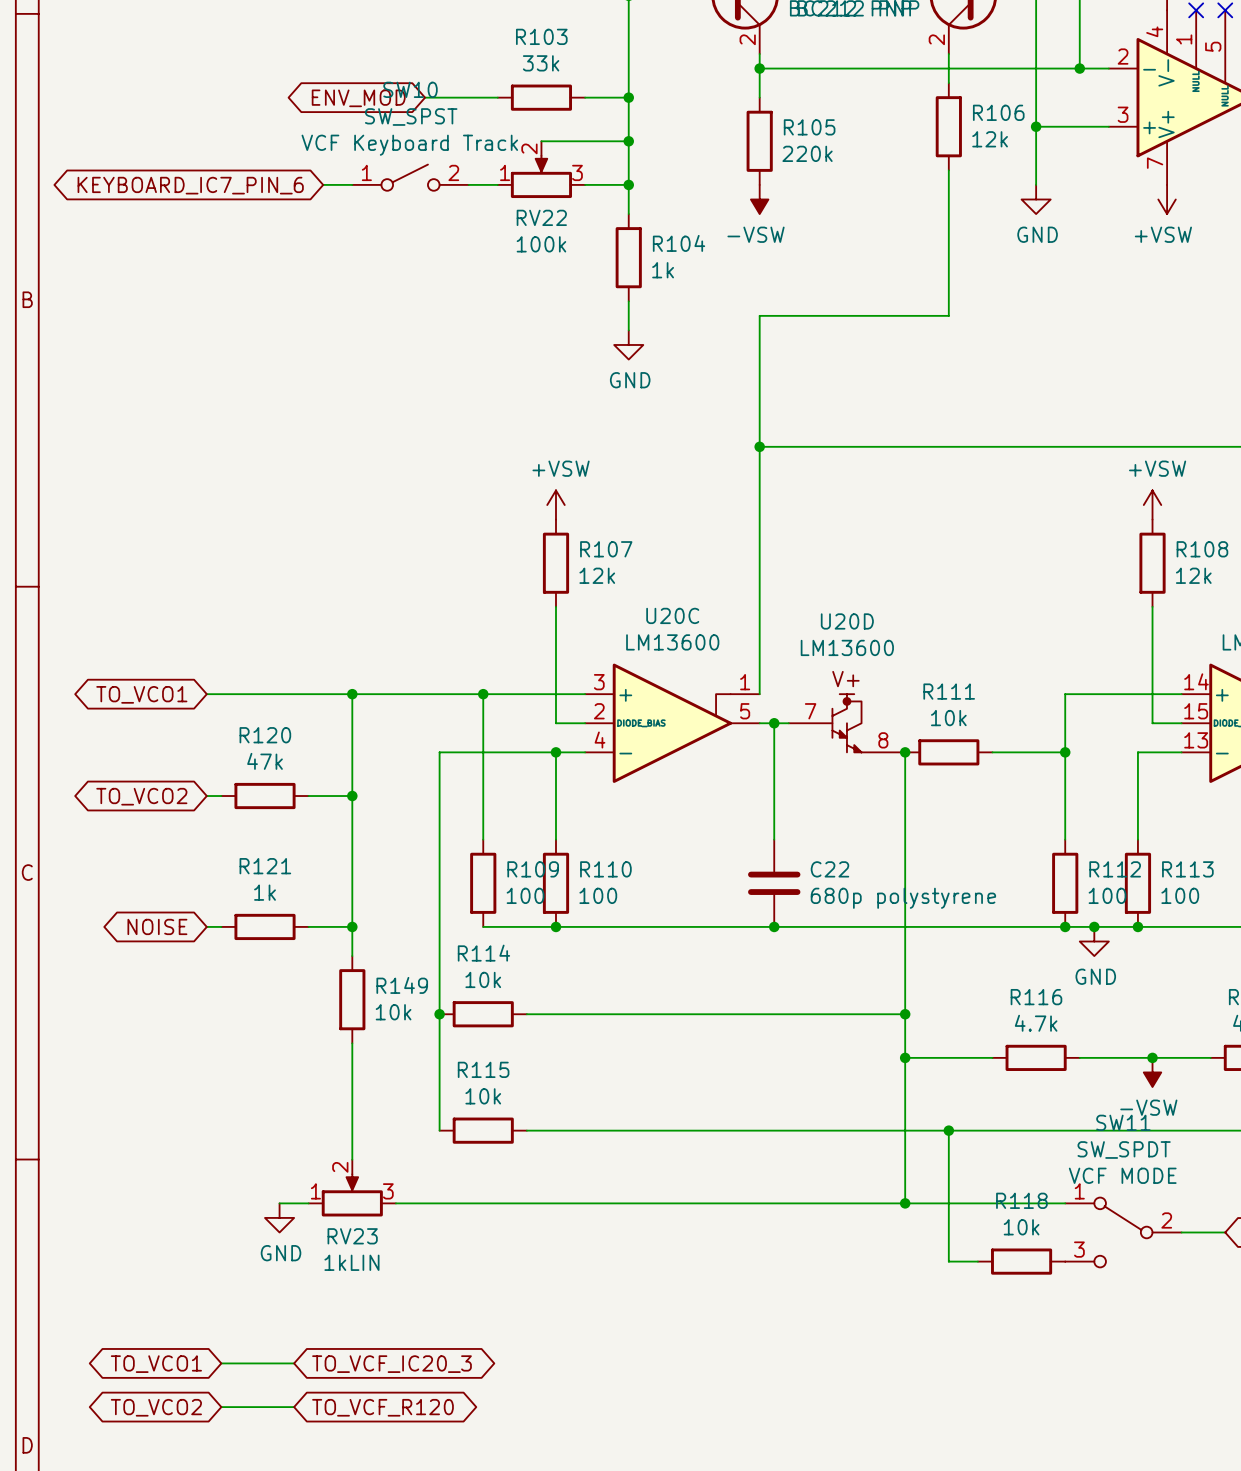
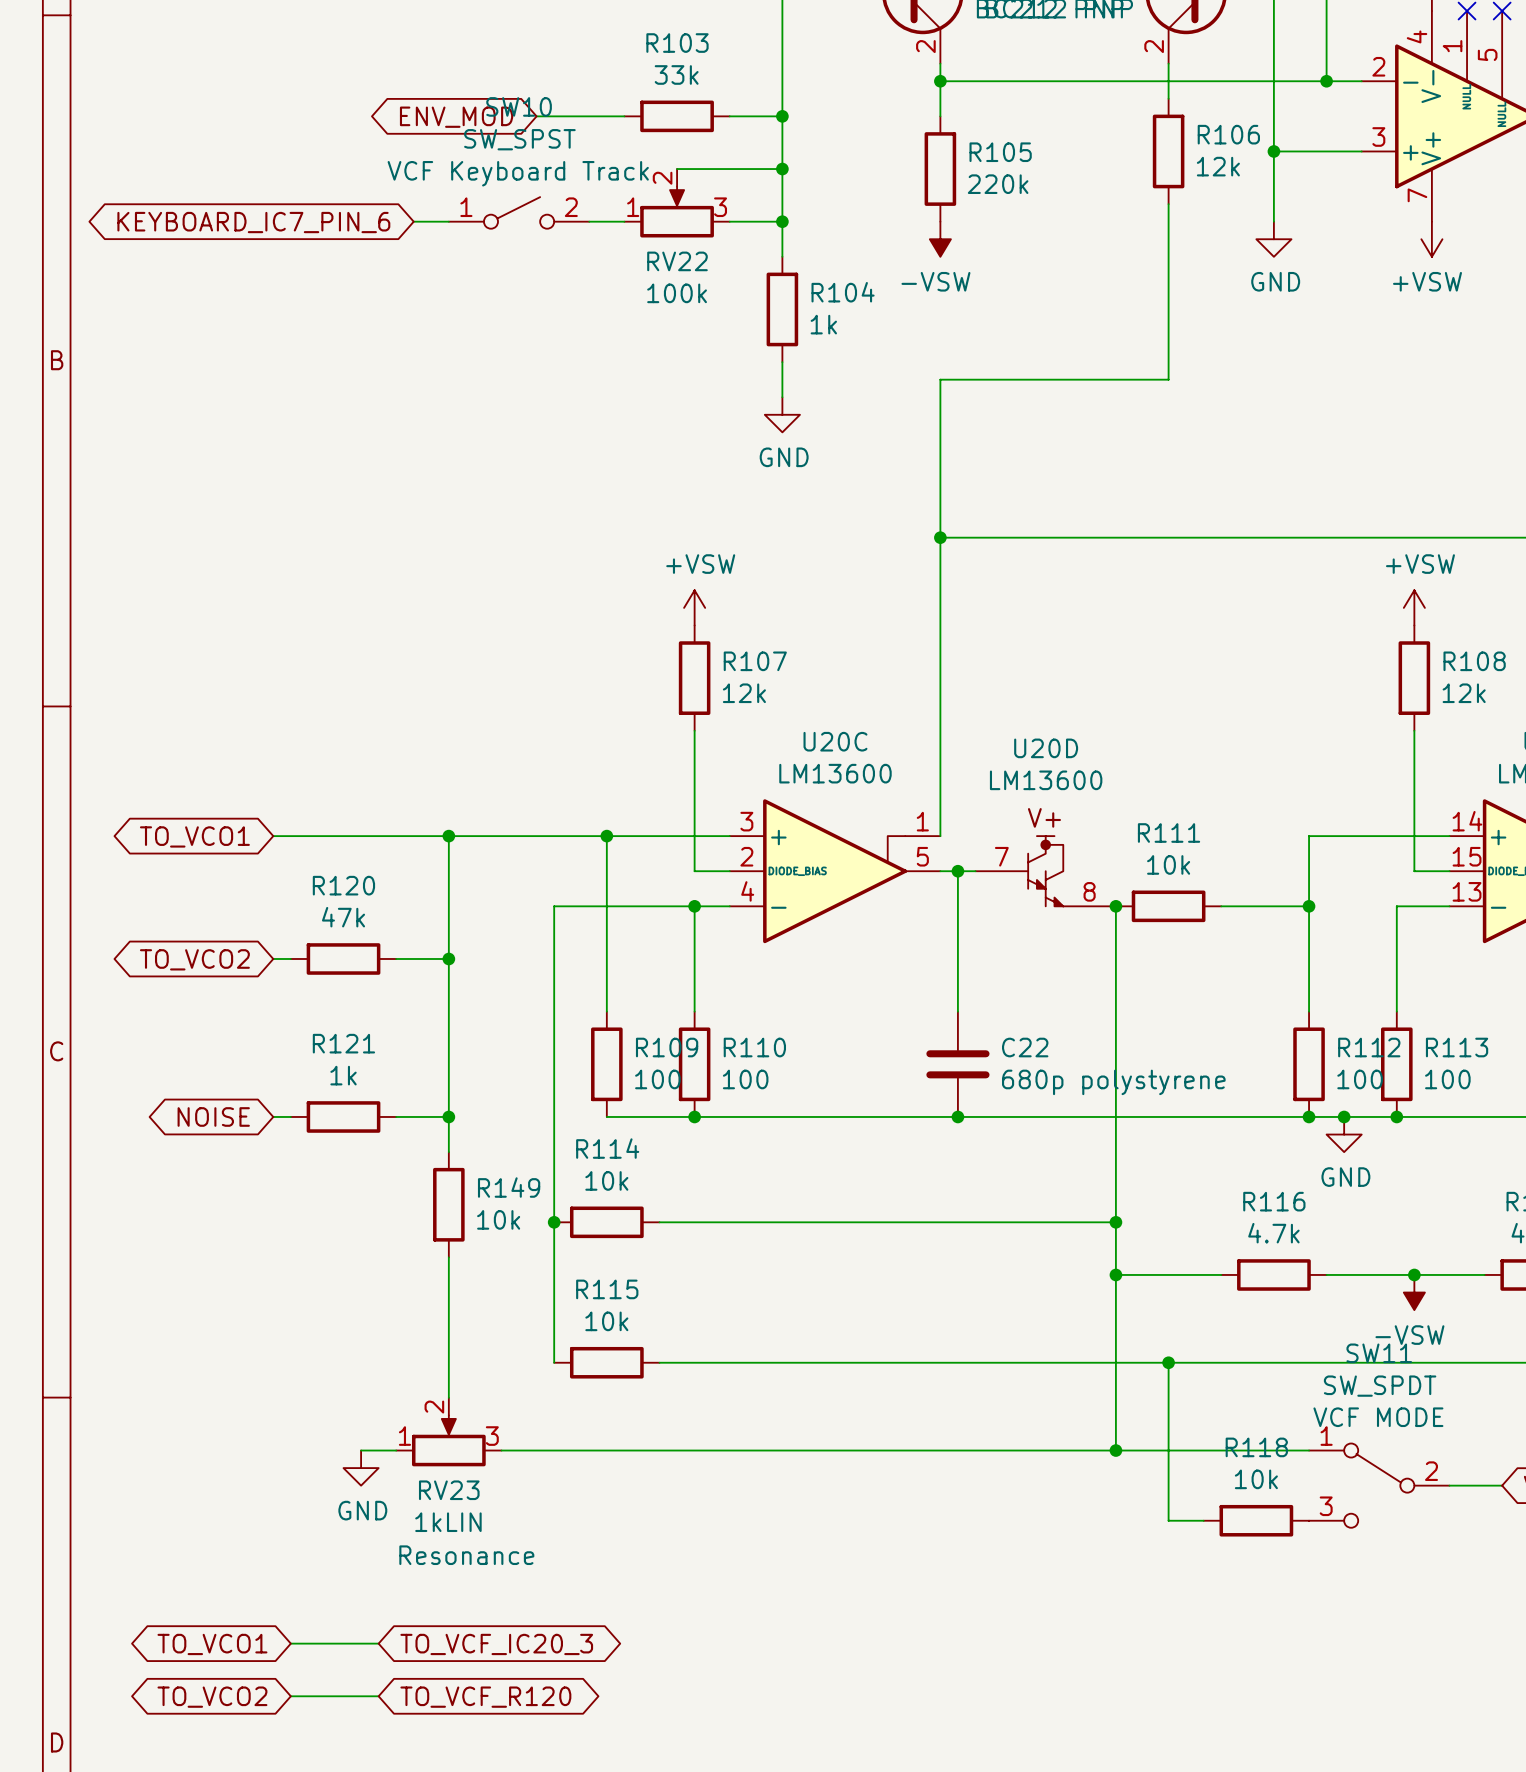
RV23 text: none -> Resonance (466, 1555)

